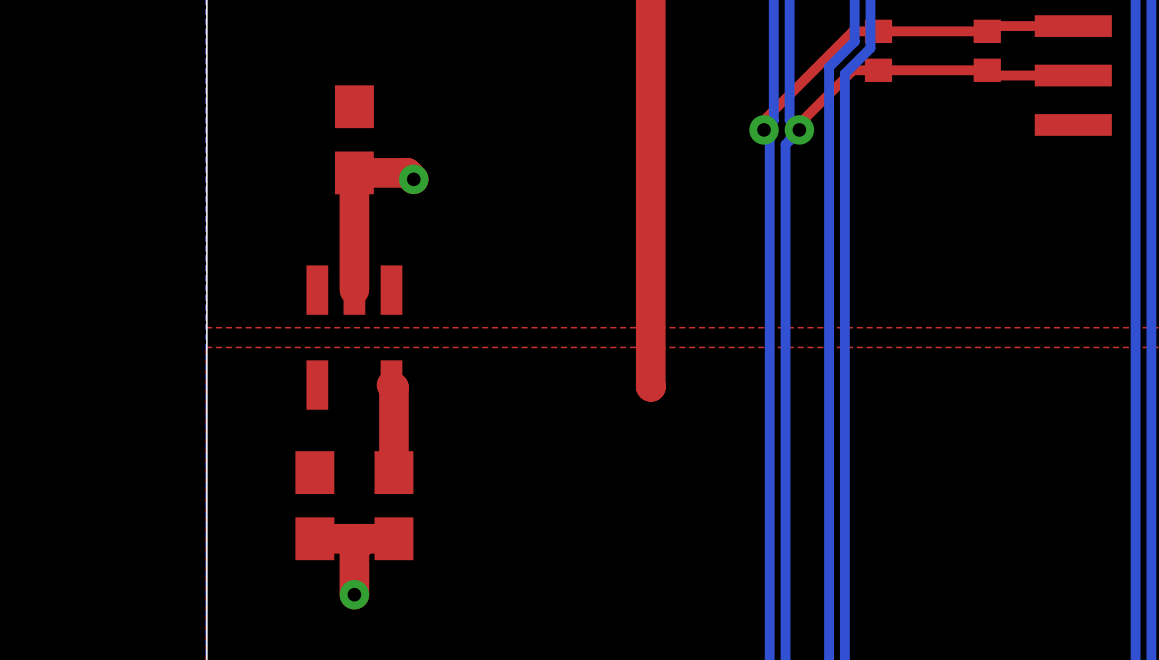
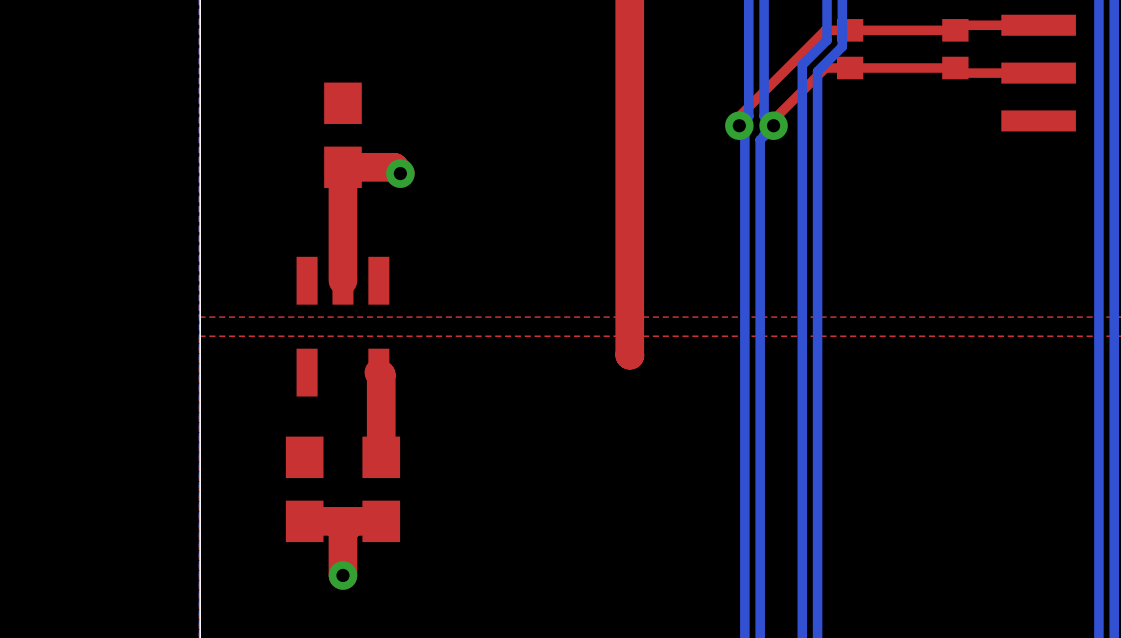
top track: (650, 366) (650, 386) -> none

